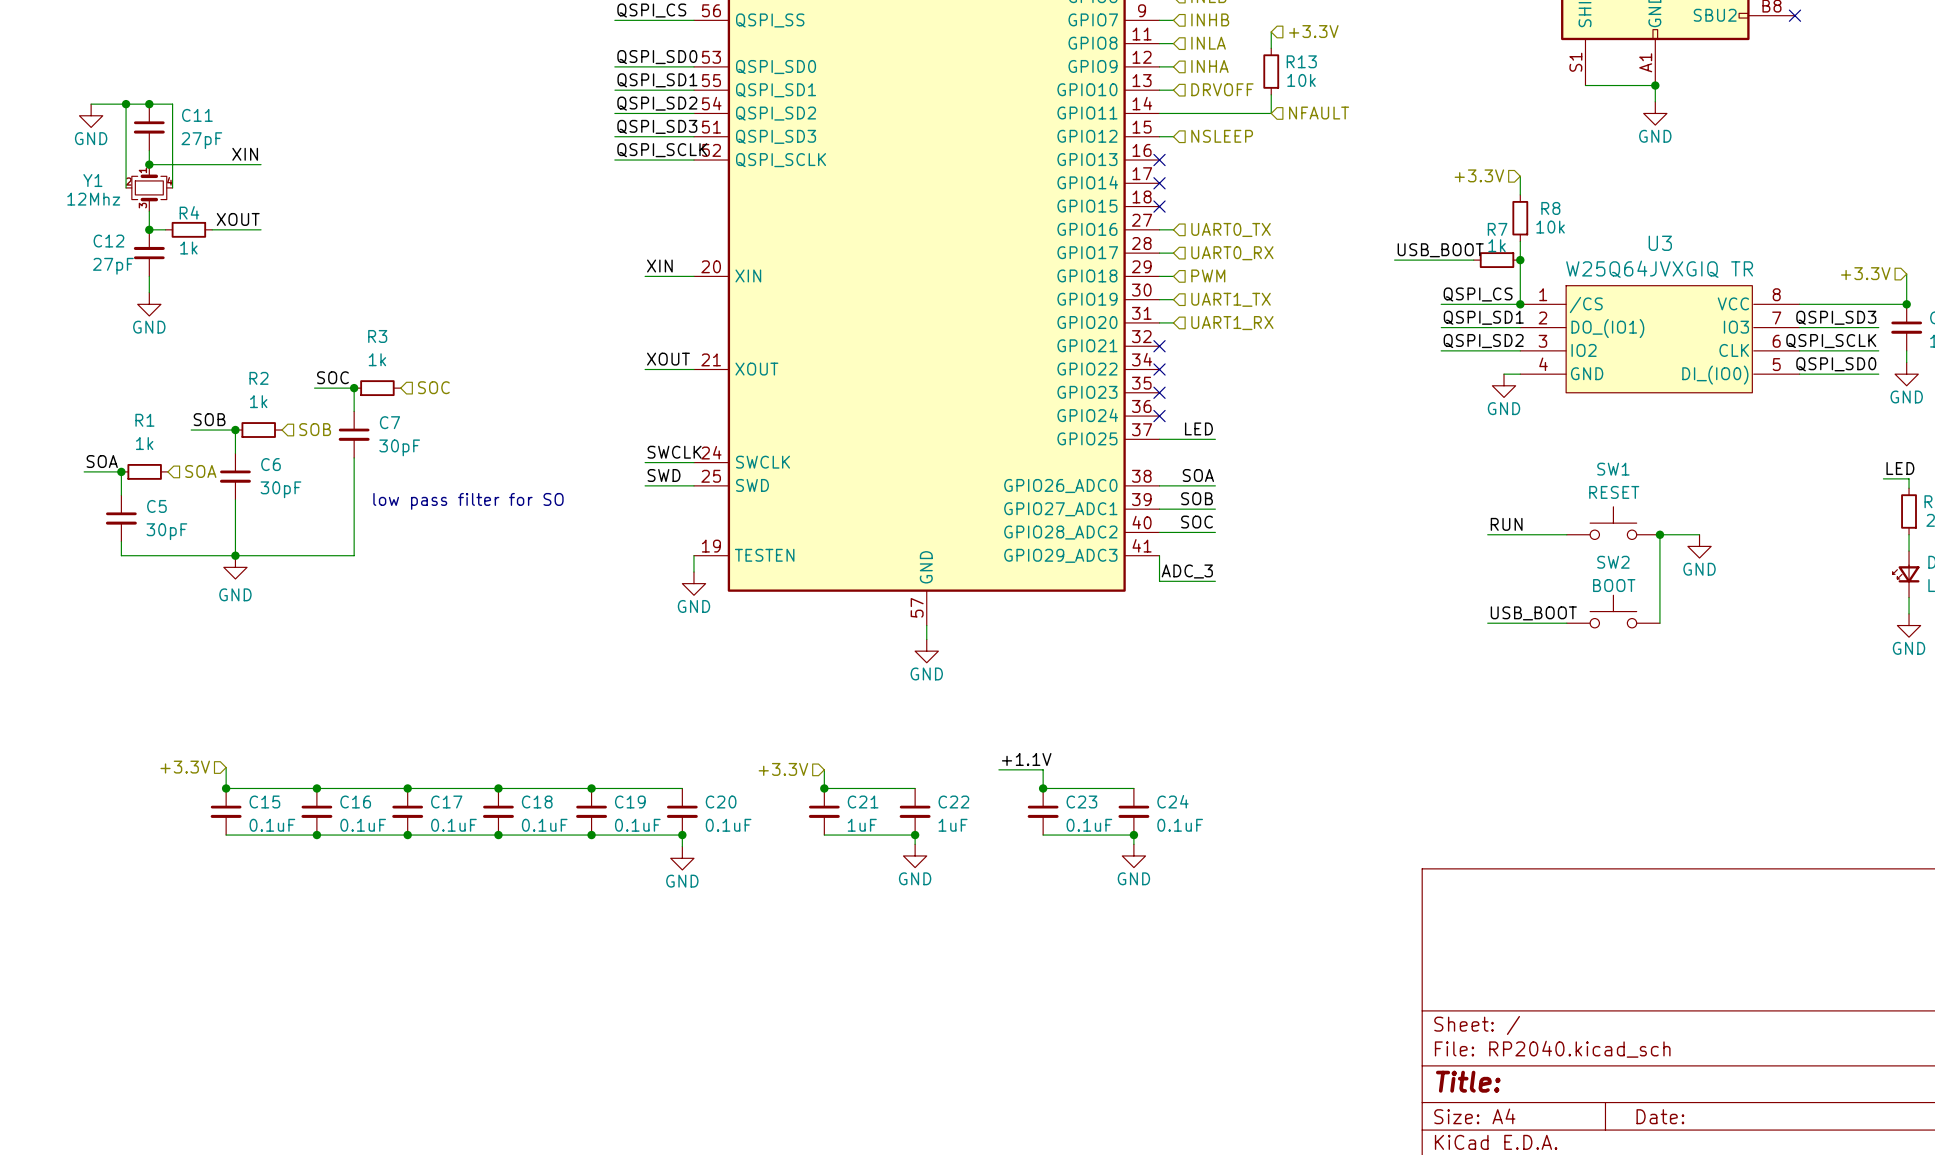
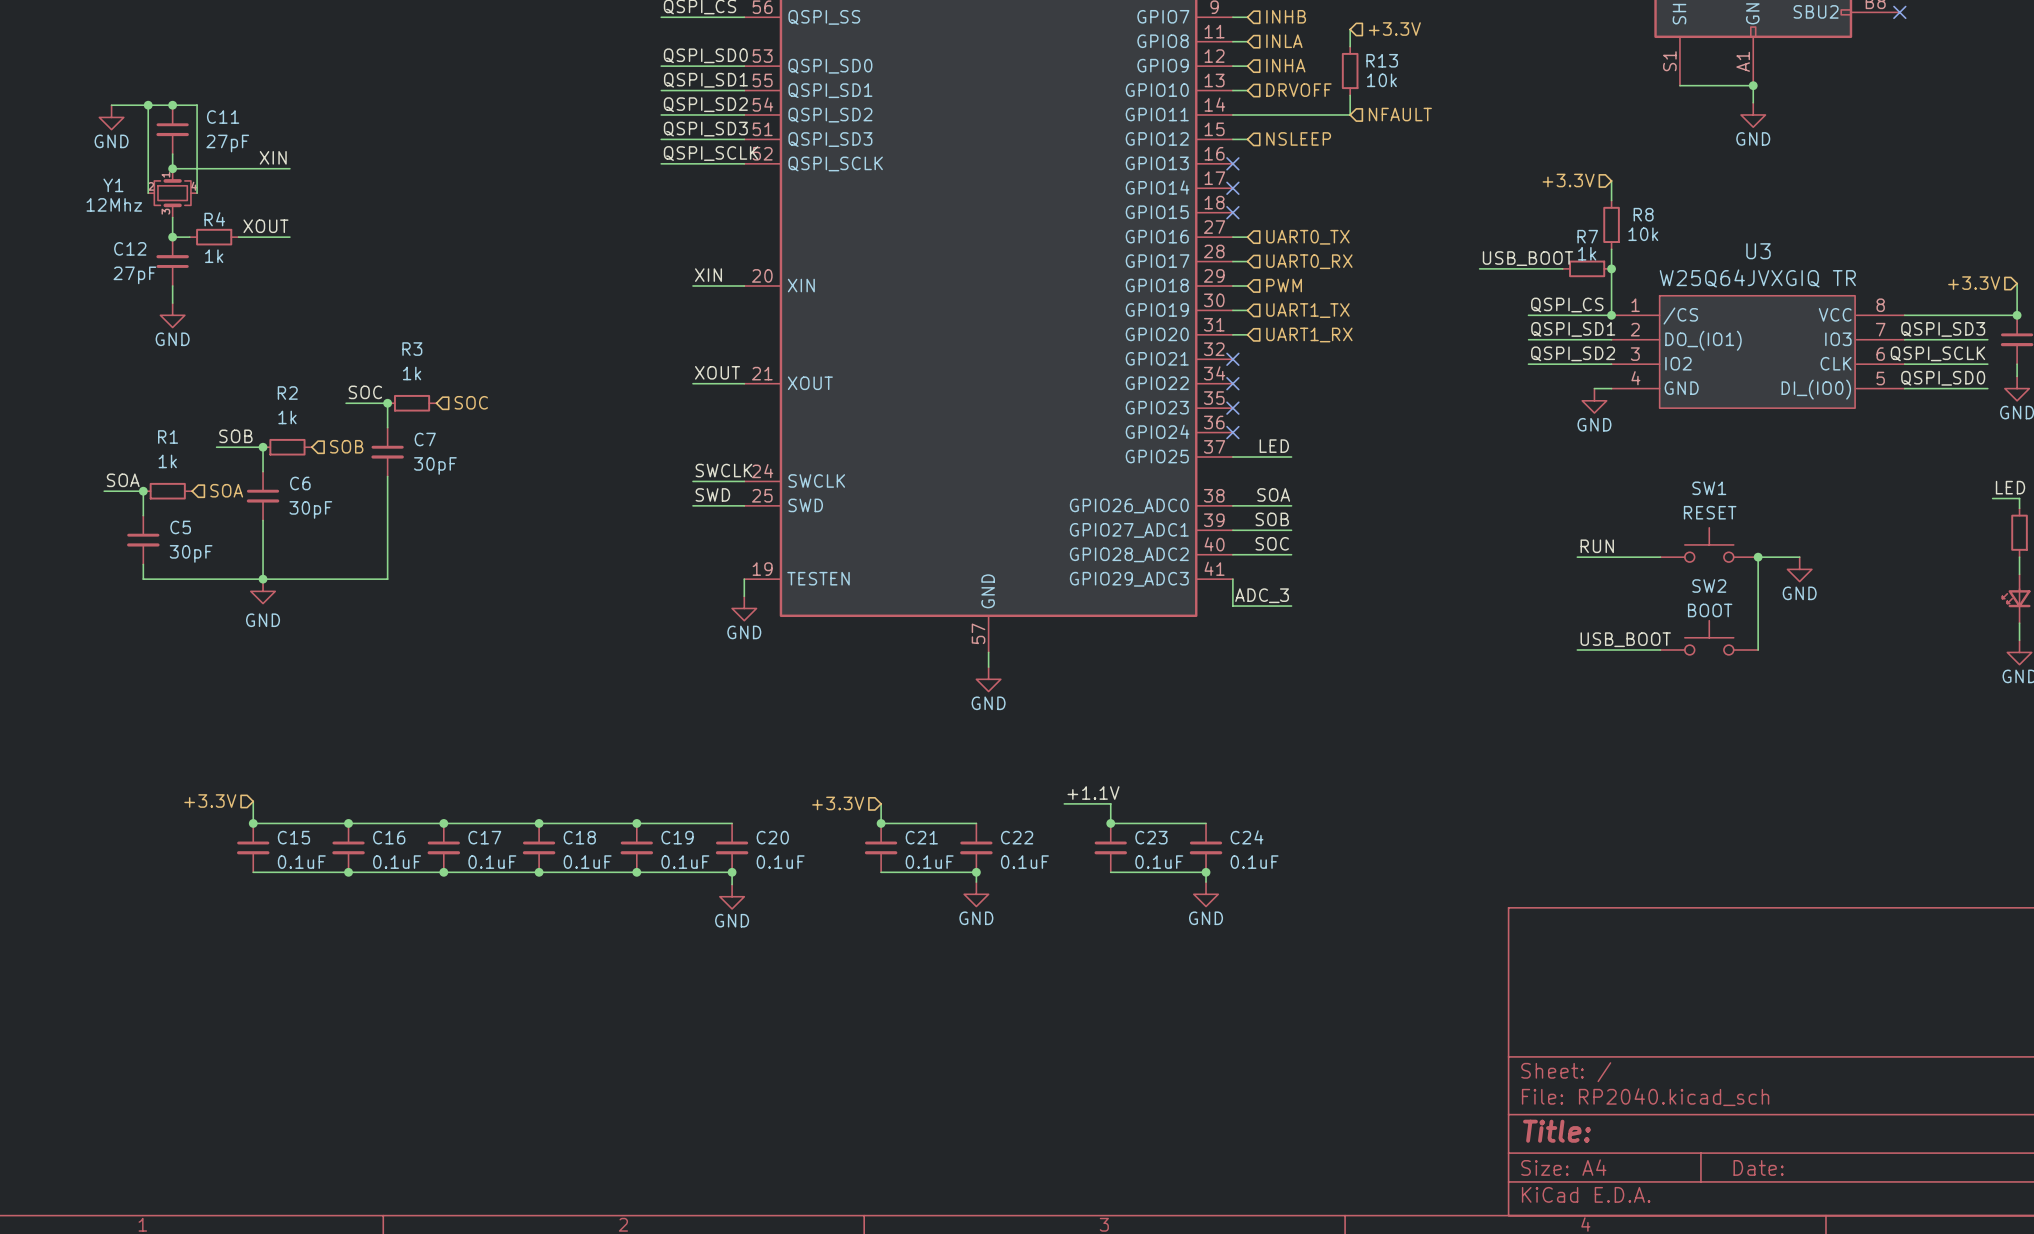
text: low pass filter for SO (468, 501) -> none
C21 value: 1uF (862, 825) -> 0.1uF (929, 862)
C22 value: 1uF (953, 825) -> 0.1uF (1024, 862)

